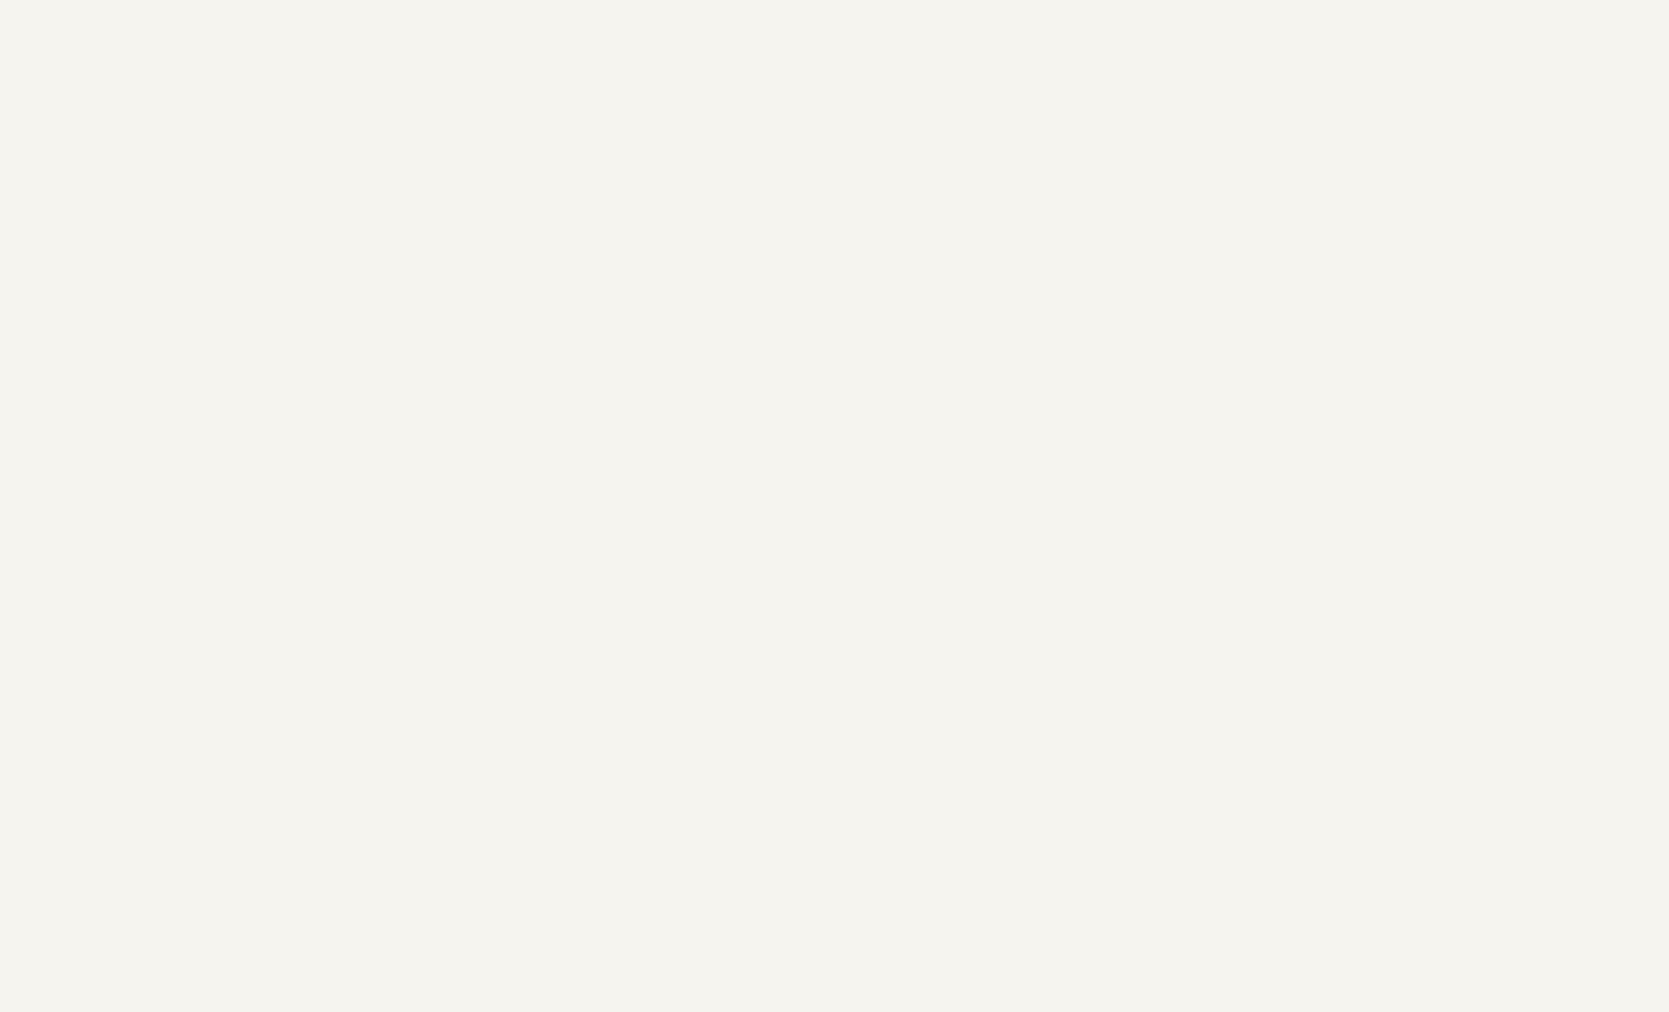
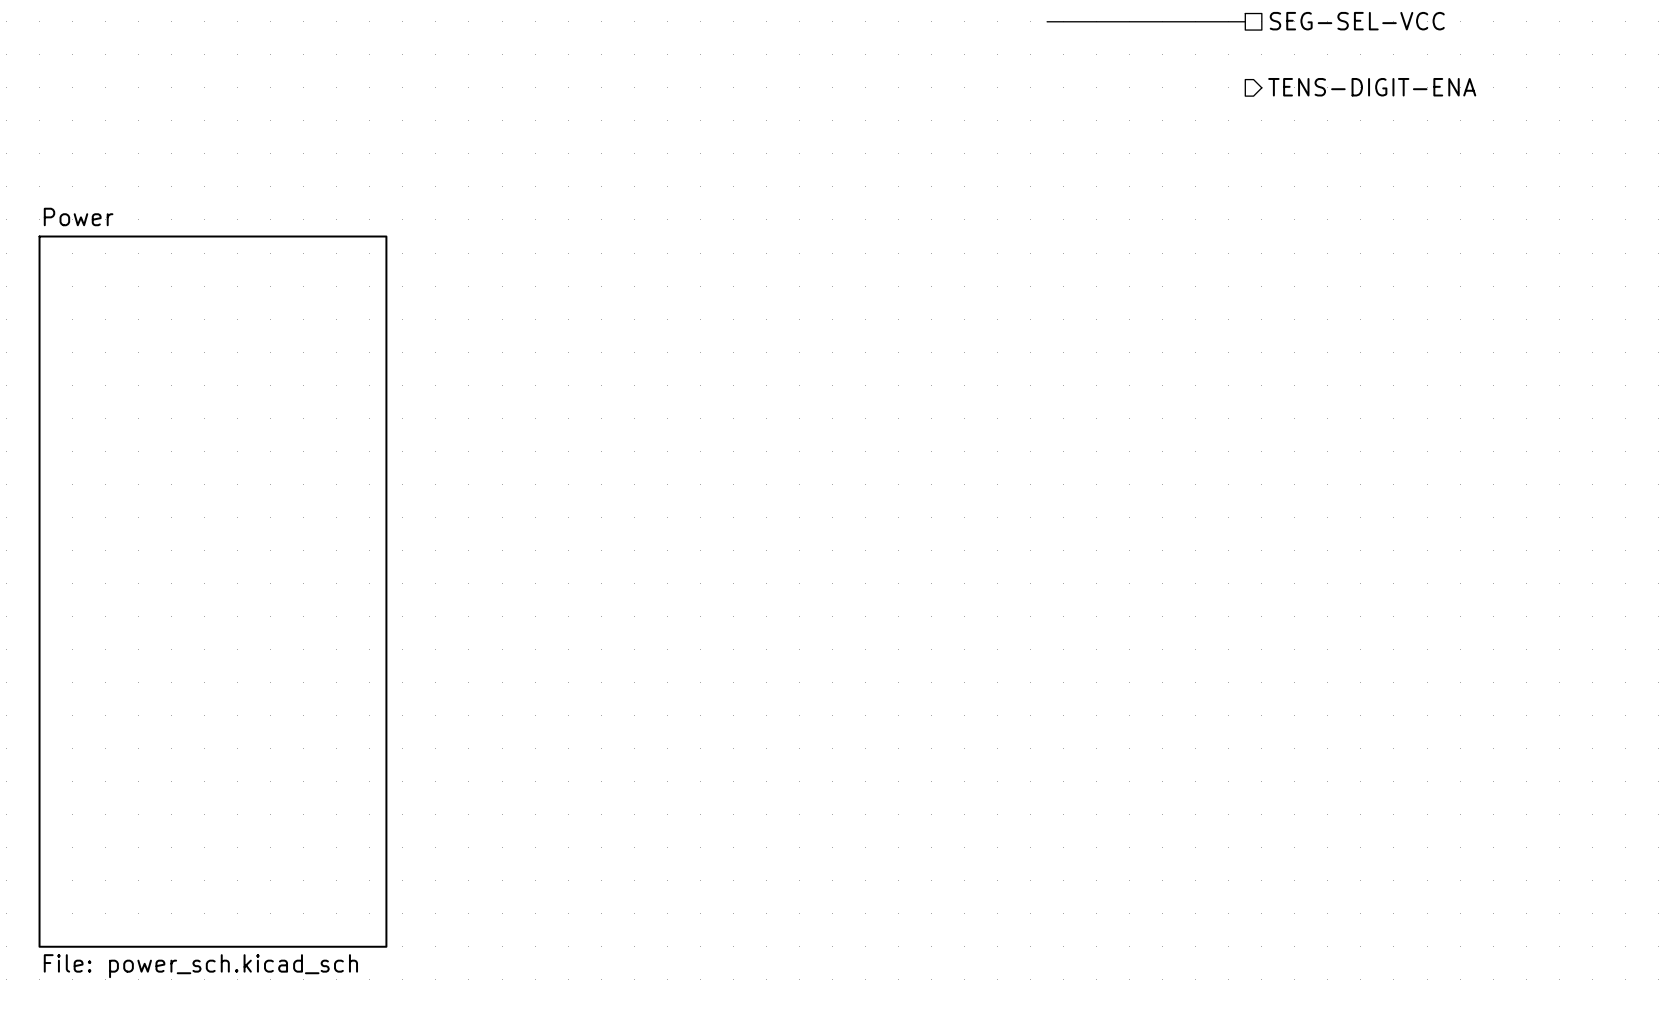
wire: none -> (1047, 21) (1245, 21)
sheet pin: none -> SEG-SEL-VCC (1357, 21)
sheet pin: none -> TENS-DIGIT-ENA (1372, 87)
sheet Power: none -> File: power_sch.kicad_sch (212, 591)

